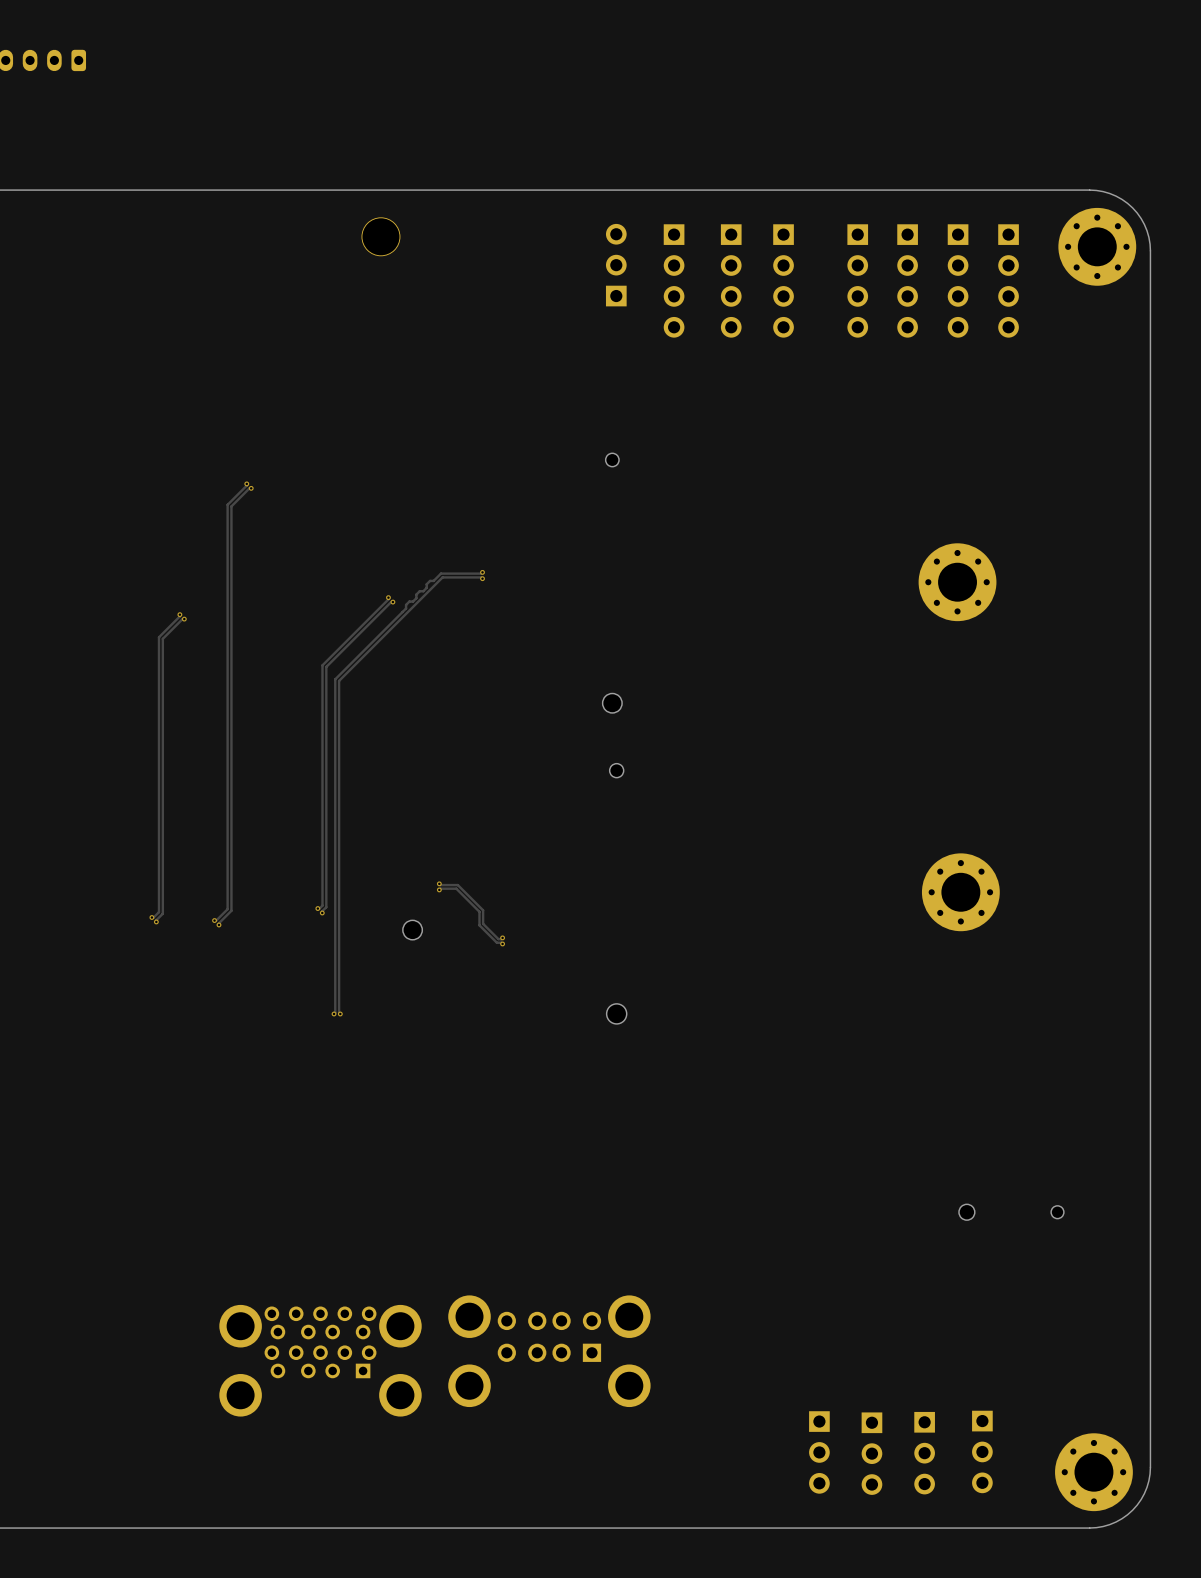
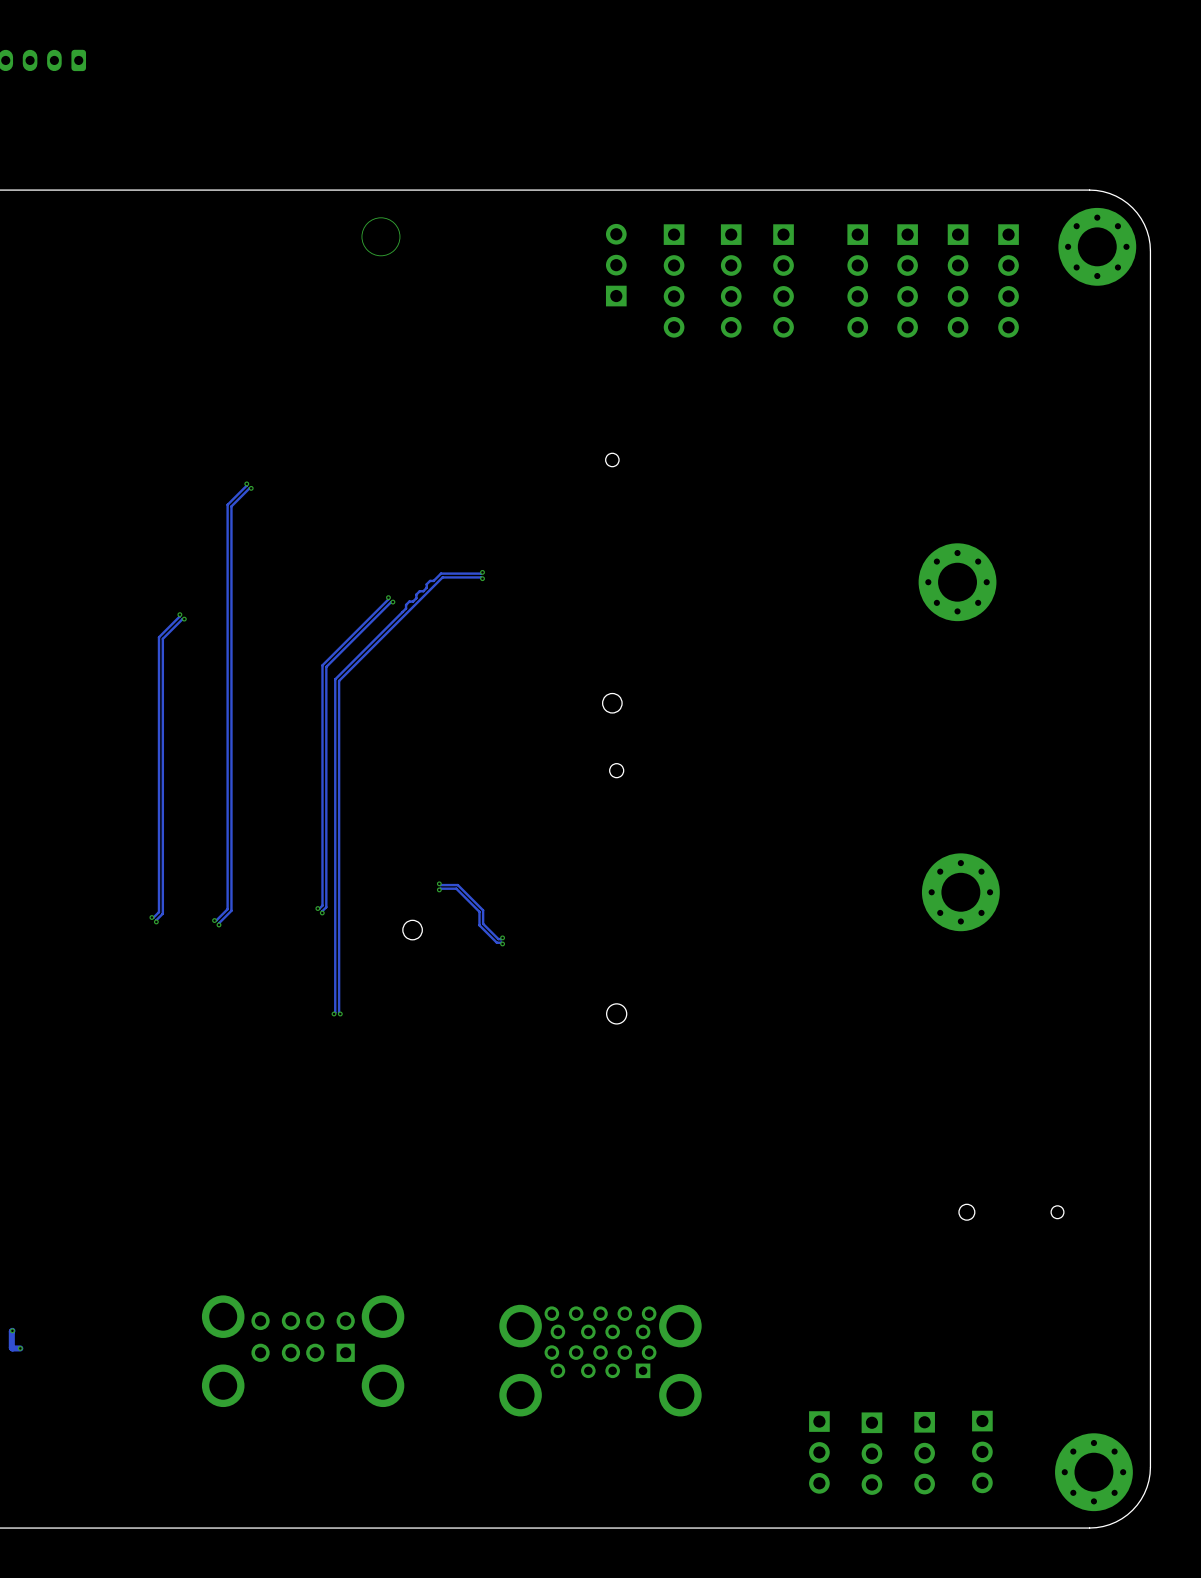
track: none -> (12, 1330) (11, 1347) (20, 1348)
via: none -> (12, 1330)
via: none -> (20, 1348)
part position: (549, 1351) -> (303, 1351)
part position: (320, 1360) -> (600, 1360)

